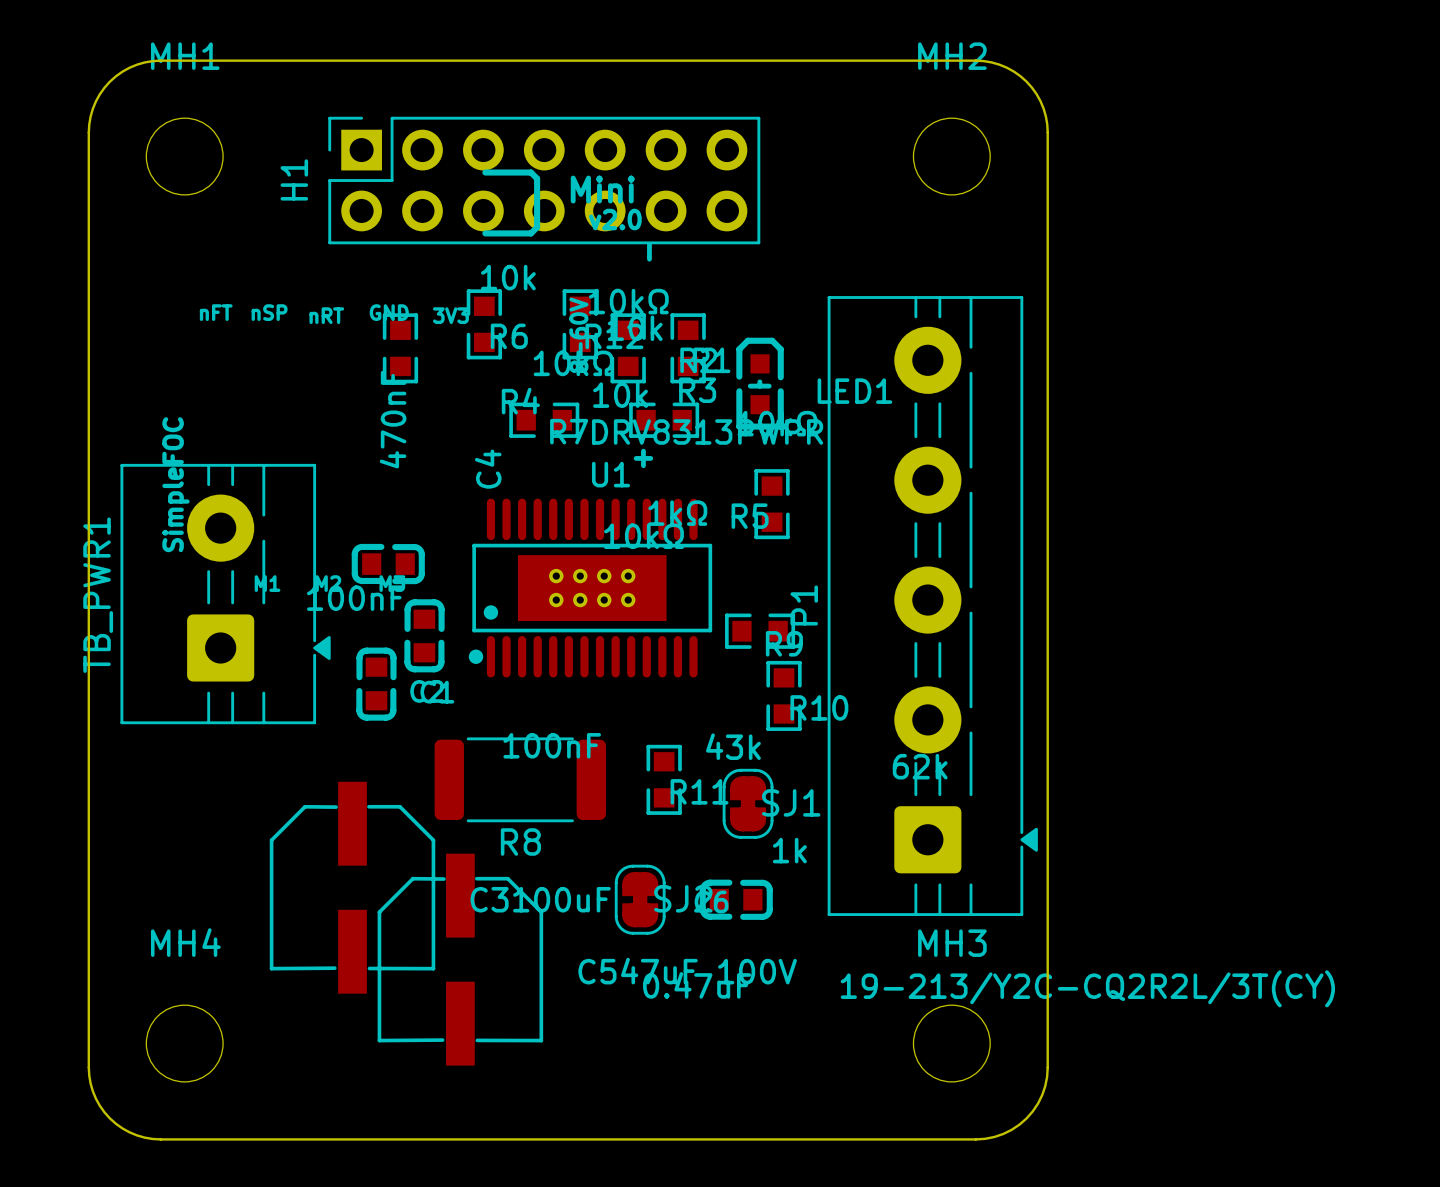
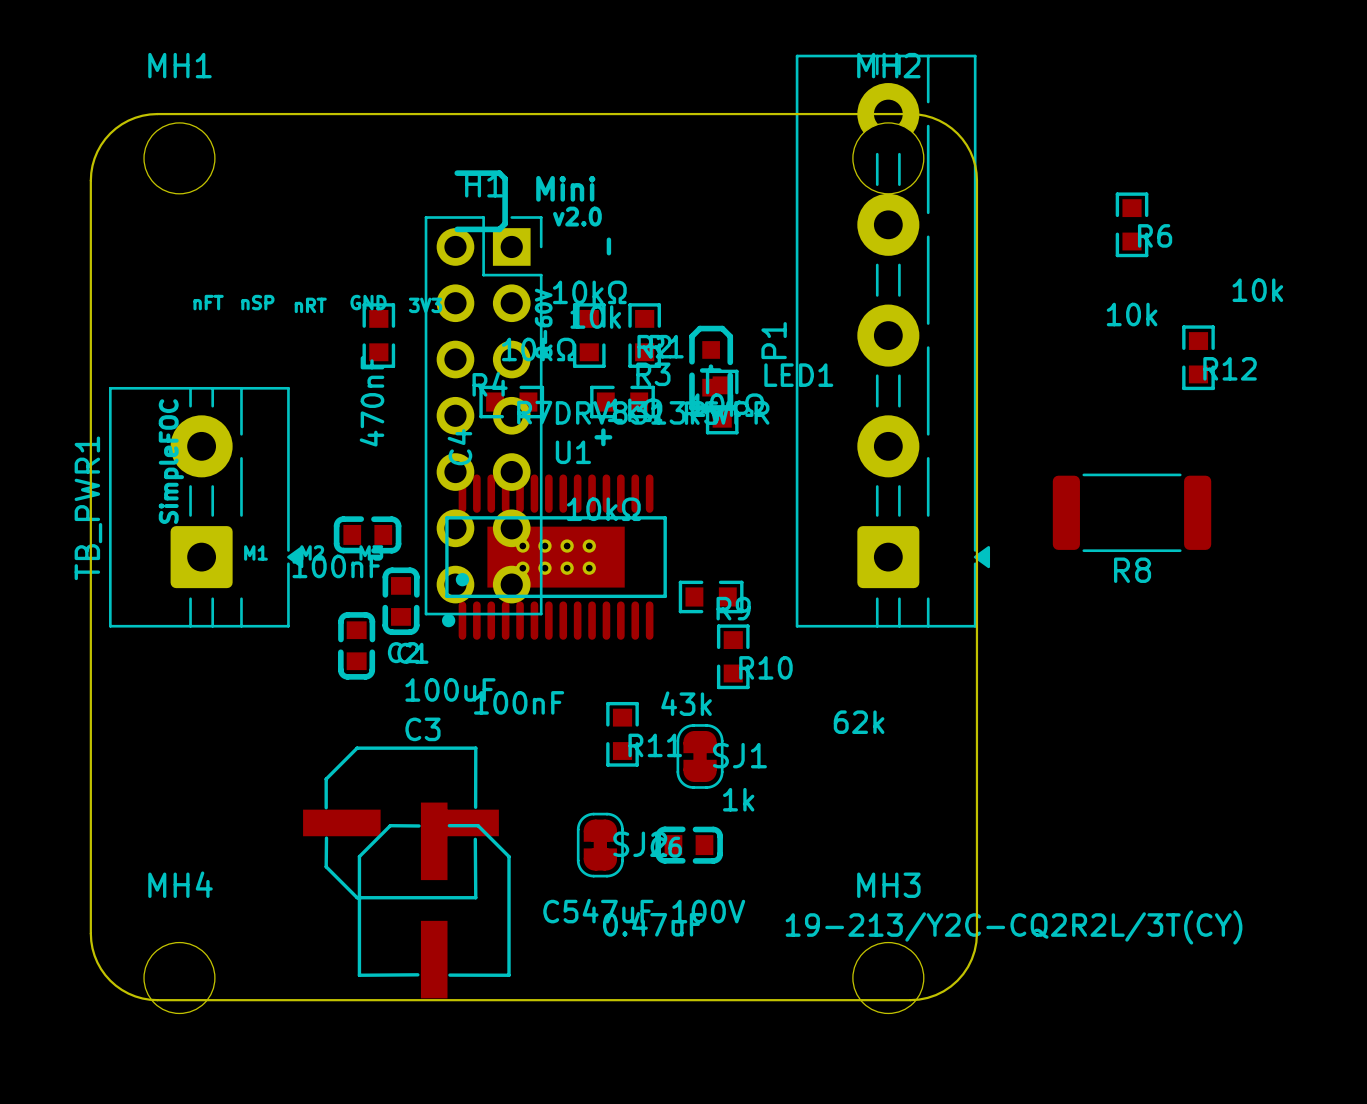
board edge: (88, 180) (89, 124) (92, 108) (99, 94) (109, 81) (122, 71) (136, 64) (160, 60) (983, 61) (1007, 67) (1020, 76) (1032, 87) (1040, 101) (1047, 124) (1047, 180) -> (90, 180) (94, 158) (101, 145) (110, 133) (121, 124) (135, 117) (157, 114) (917, 114) (939, 120) (951, 128) (962, 139) (973, 158) (976, 180)
H1 rotation: 0° (544, 180) -> 90° clockwise (483, 415)
R6 position: (484, 324) -> (1132, 224)
R12 position: (580, 324) -> (1198, 357)
R5 position: (772, 504) -> (722, 402)
TB_PWR1 position: (225, 594) -> (206, 507)
P1 position: (932, 606) -> (892, 341)
R8 position: (520, 779) -> (1132, 512)
C3 rotation: 0° (352, 887) -> 90° counterclockwise (400, 822)
C3 value position: 100uF (561, 899) -> 100uF (450, 689)
board edge: (88, 995) (89, 1075) (95, 1098) (104, 1112) (122, 1128) (136, 1135) (160, 1139) (985, 1138) (1003, 1133) (1019, 1124) (1032, 1111) (1042, 1095) (1047, 1067) (1047, 995) -> (90, 933) (94, 955) (101, 969) (110, 980) (128, 993) (142, 998) (157, 1000) (919, 999) (943, 991) (963, 974) (974, 950) (976, 933)

